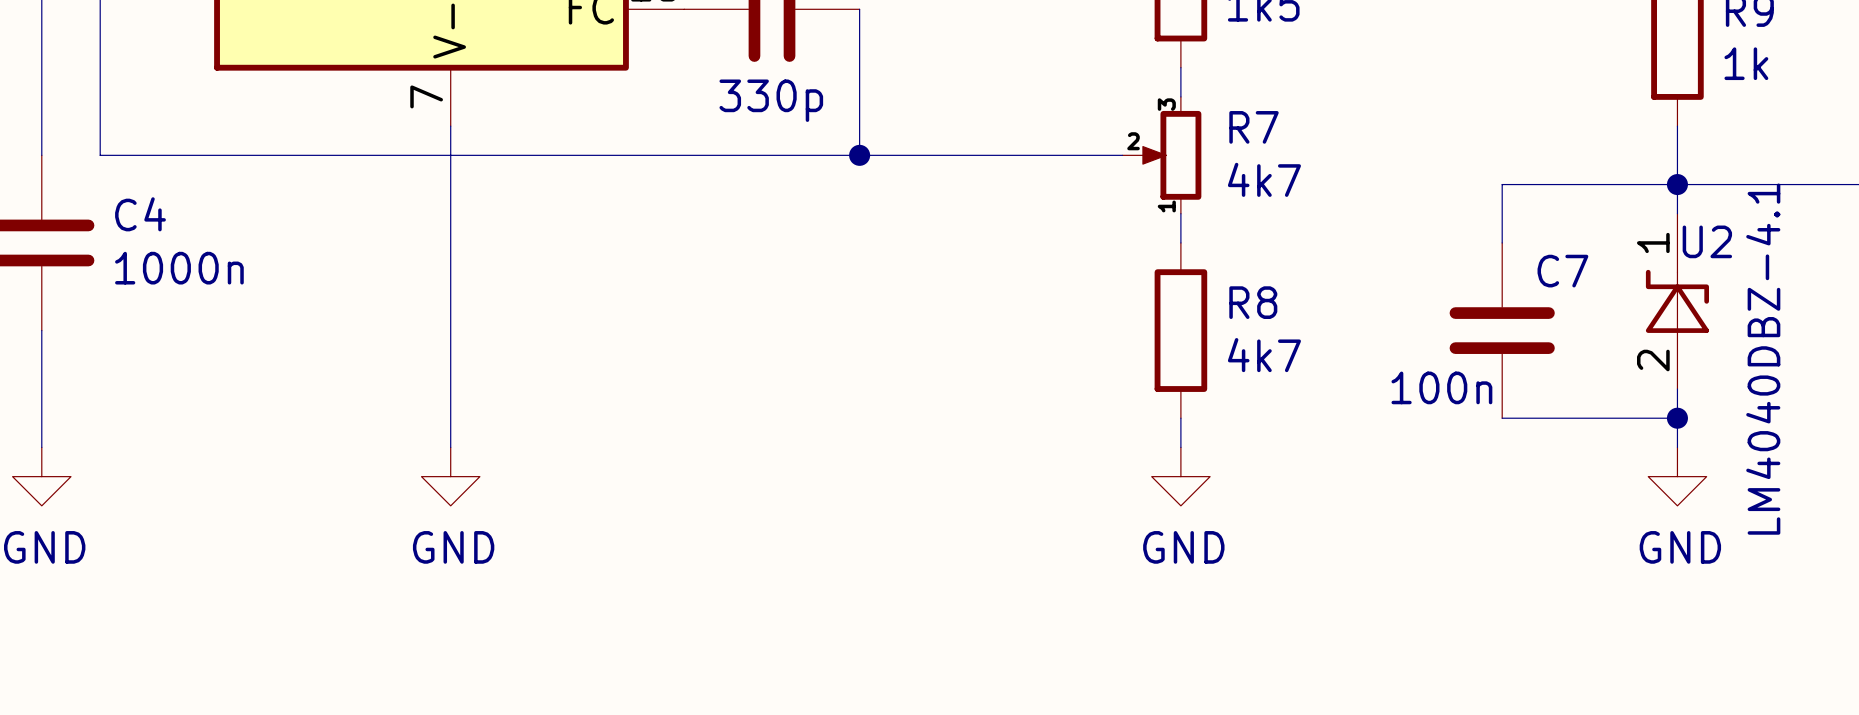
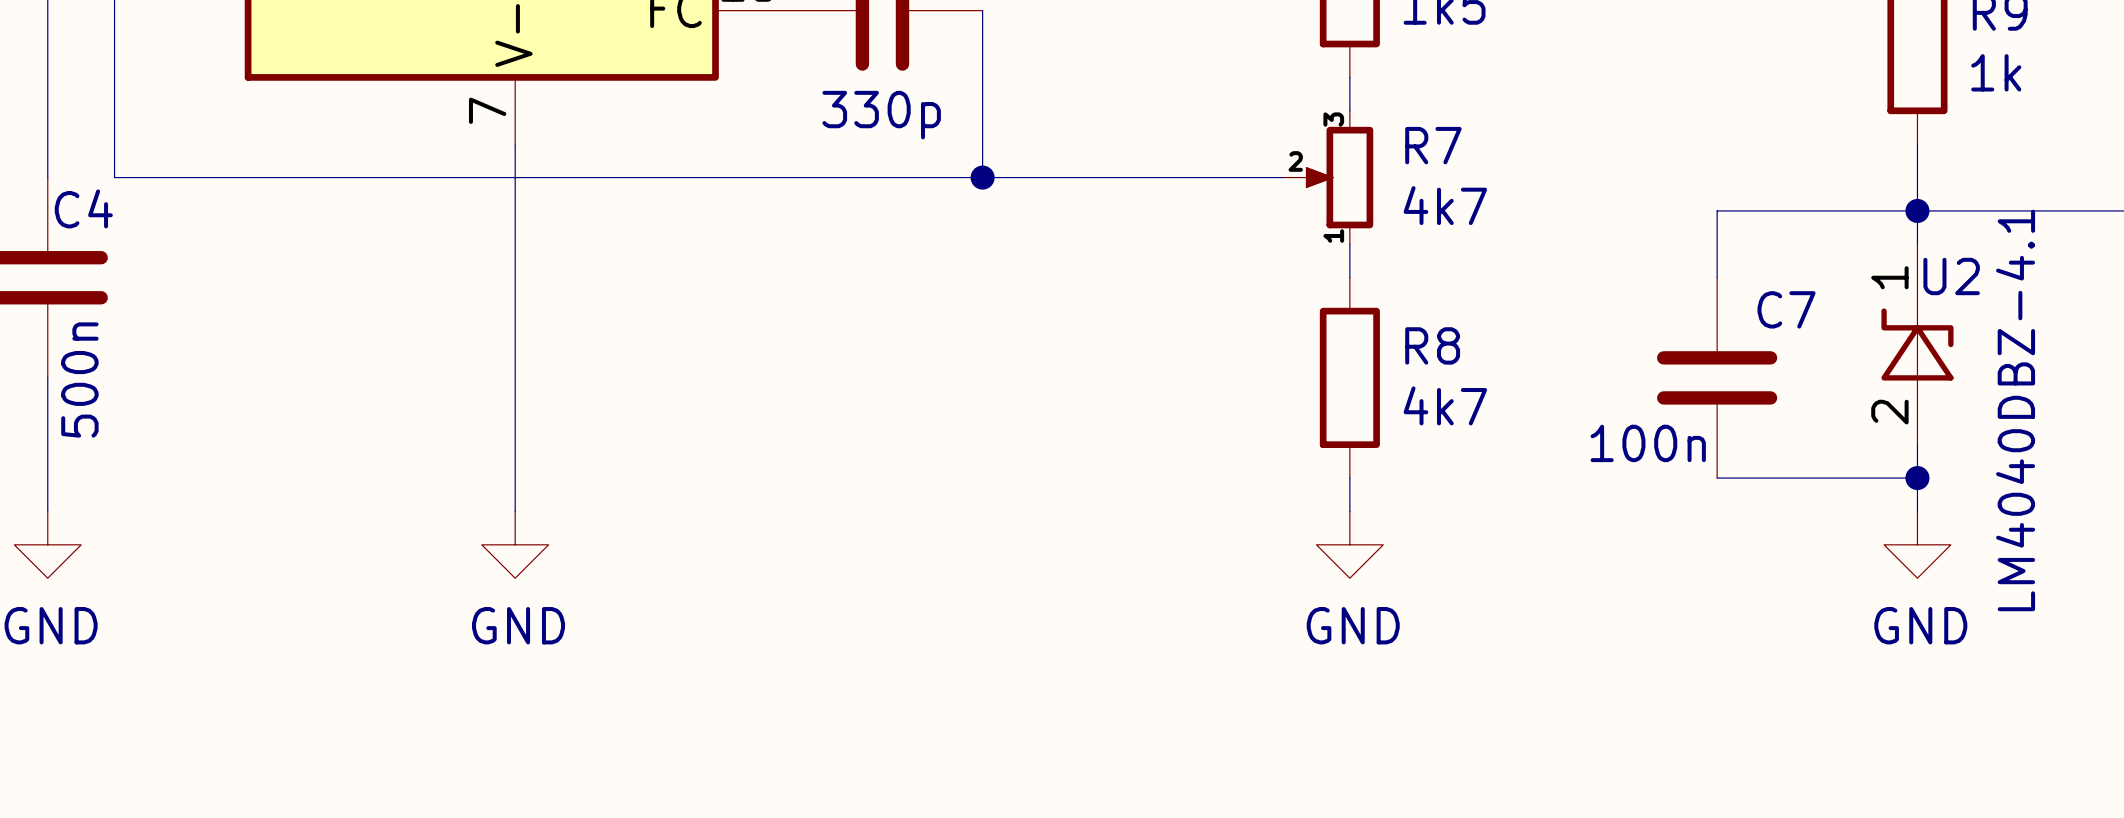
C4 name position: C4 (140, 214) -> C4 (83, 208)
C4 value: 1000n (179, 268) -> 500n (79, 380)

